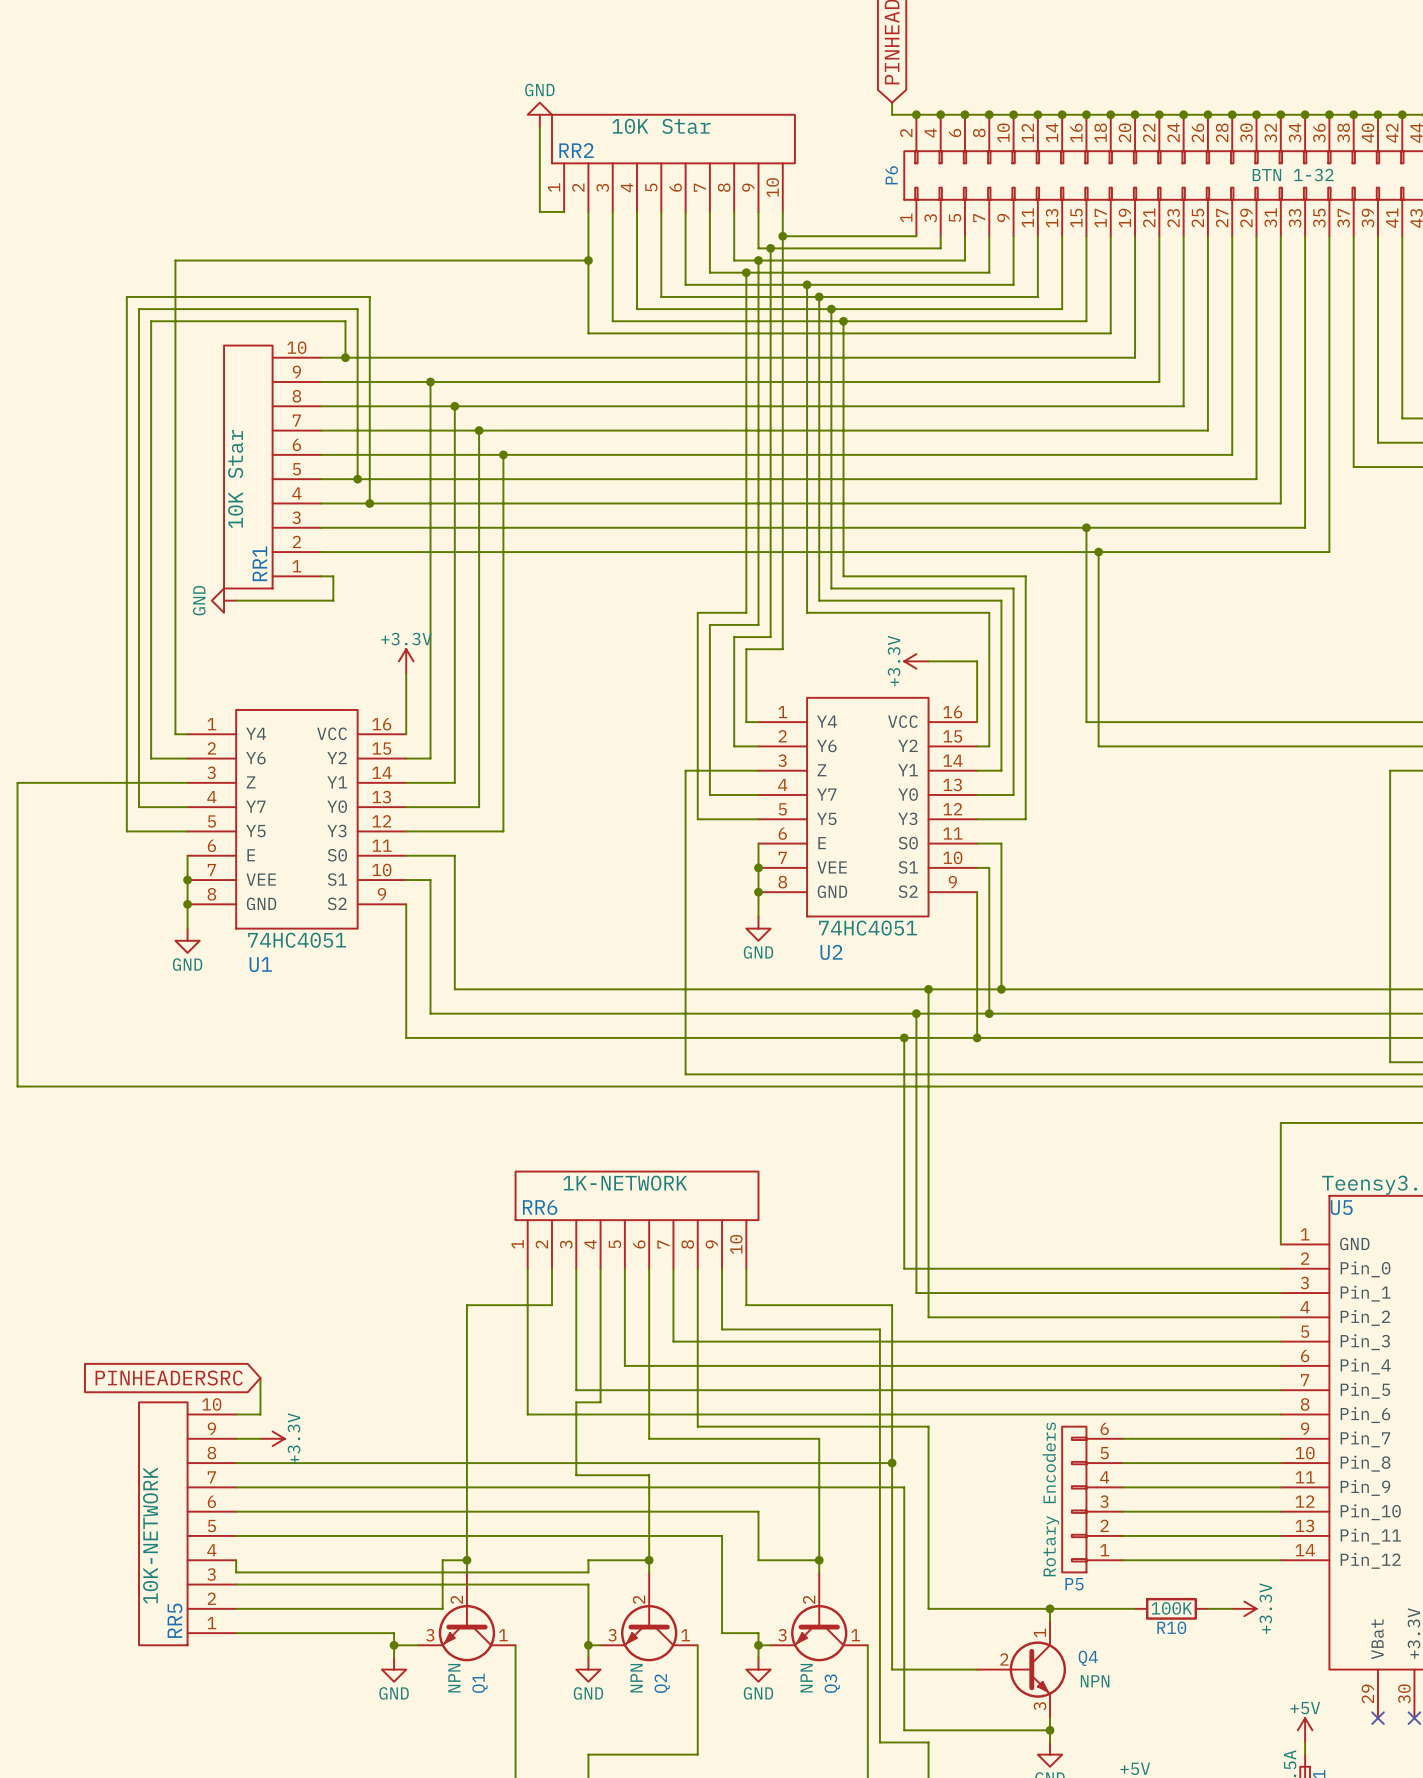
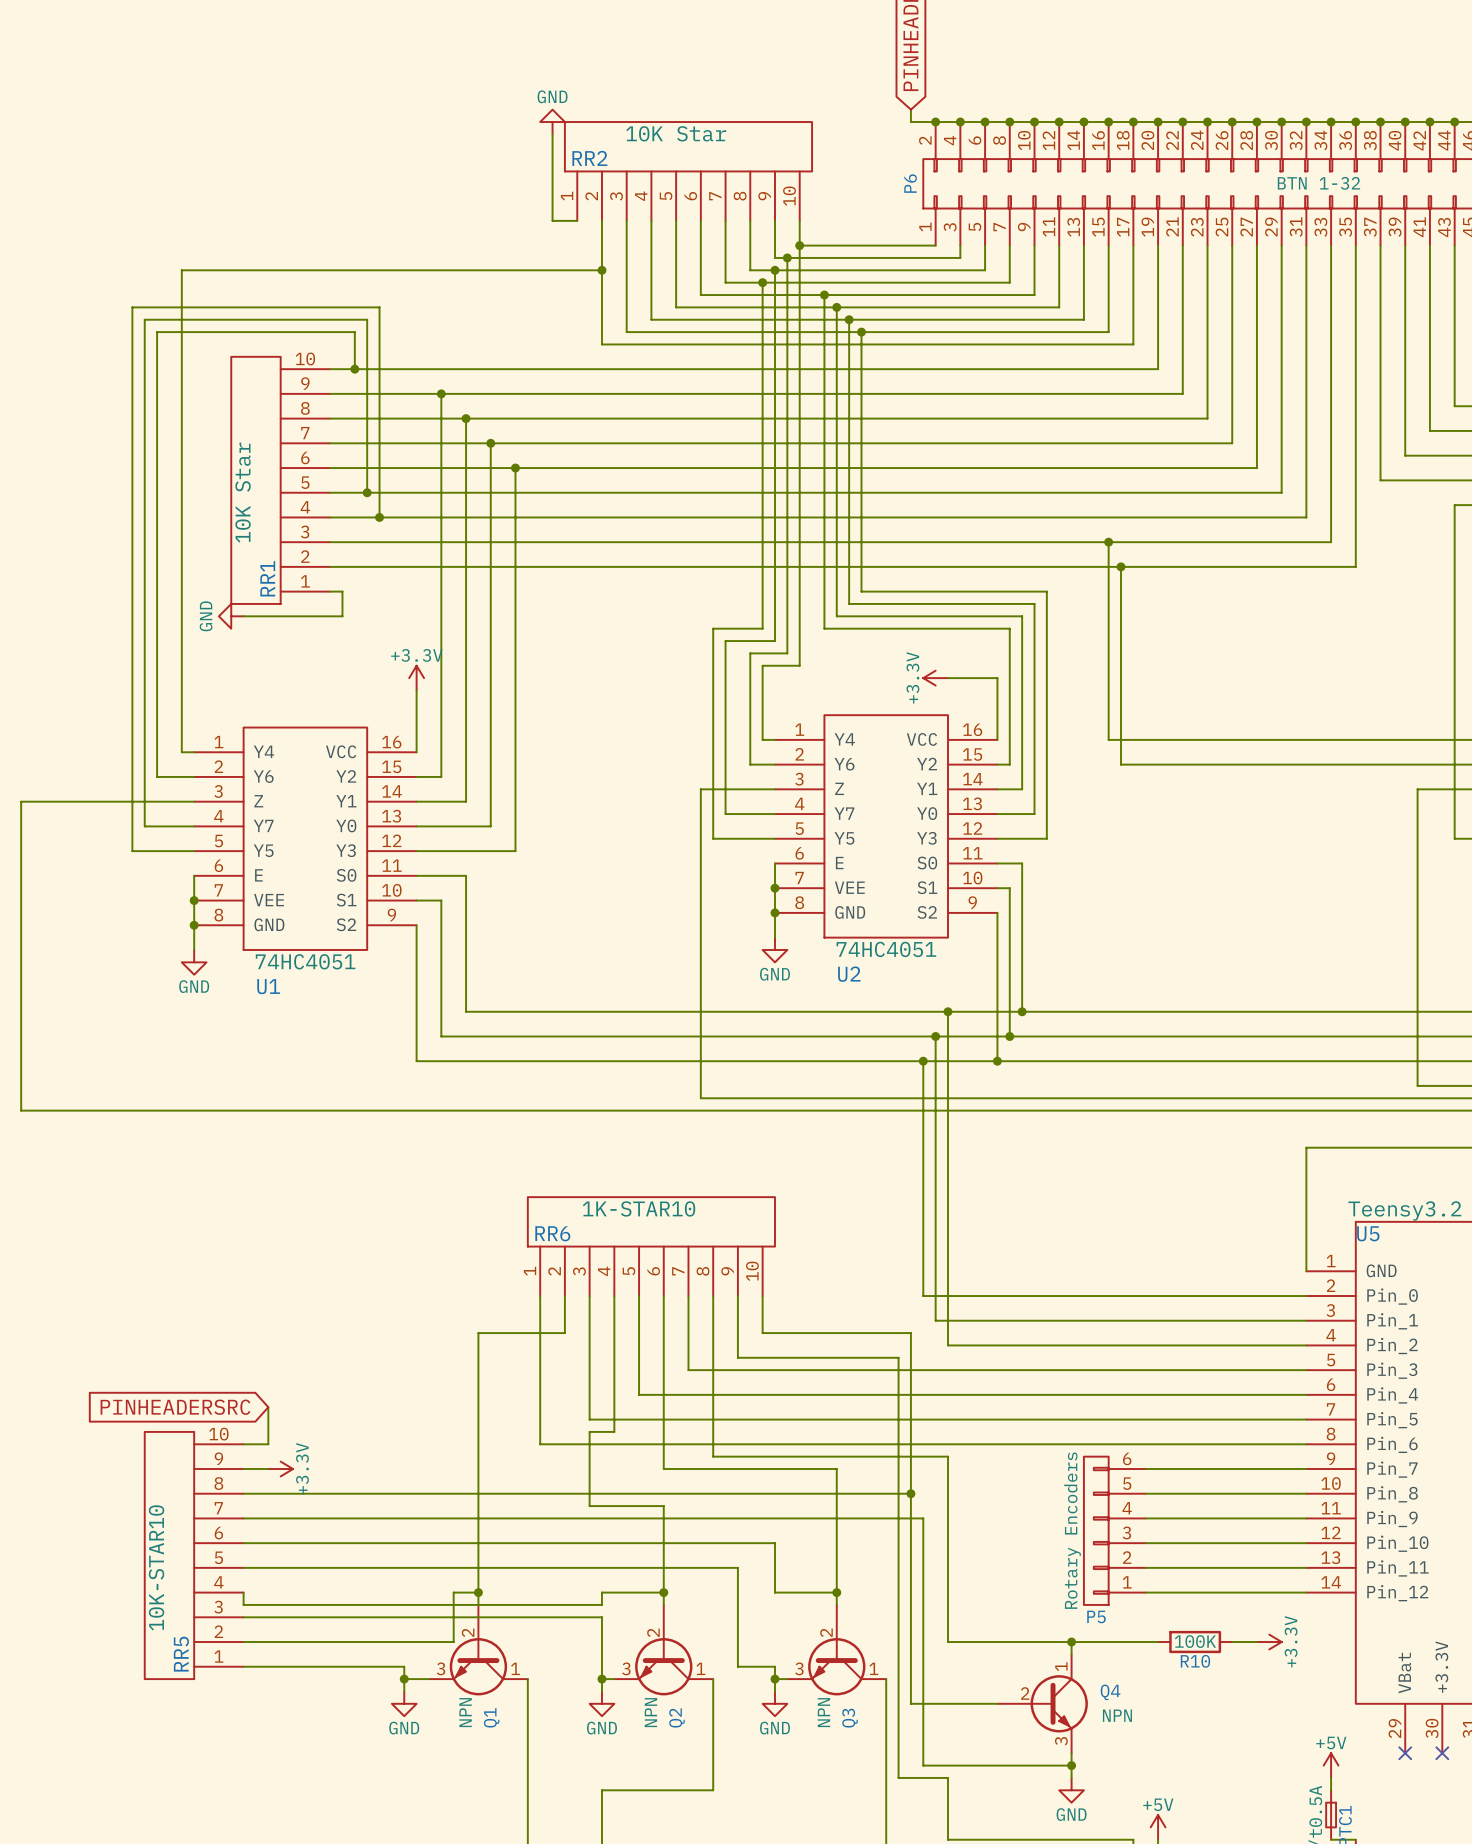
RR6 value: 1K-NETWORK (625, 1183) -> 1K-STAR10 (639, 1208)
RR5 value: 10K-NETWORK (150, 1535) -> 10K-STAR10 (156, 1567)

